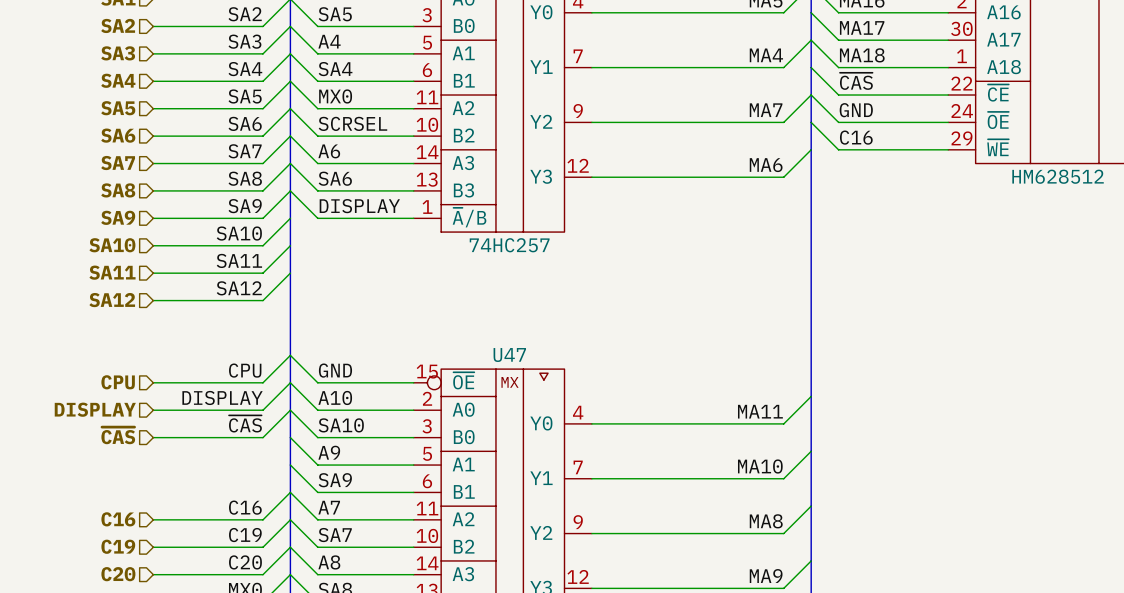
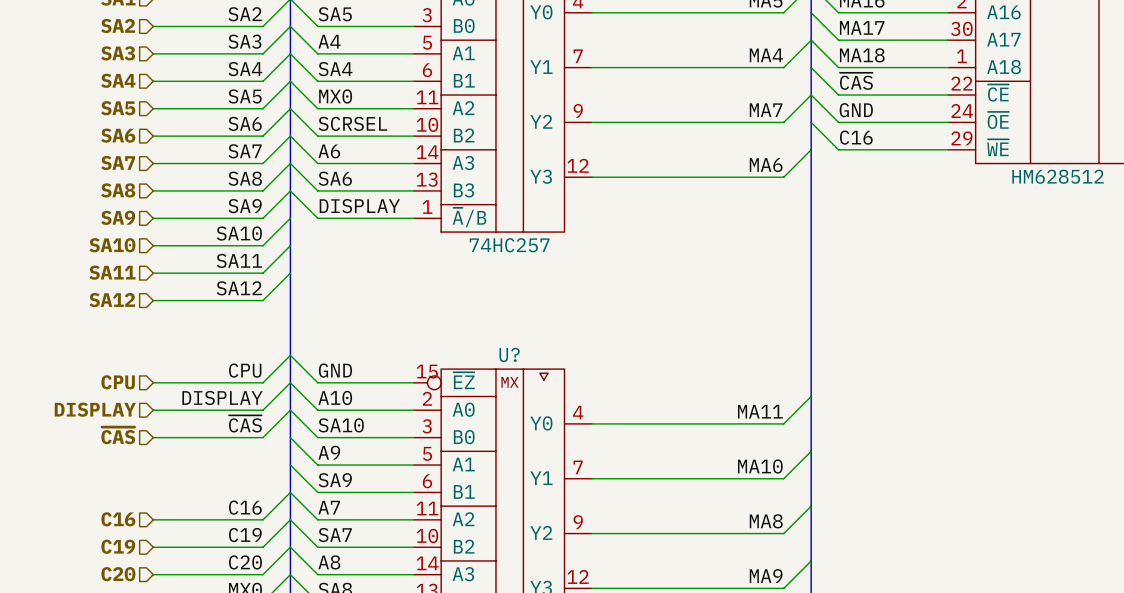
U47 name: U47 (509, 355) -> U? (509, 354)
U47 pin name: ~{OE} (463, 380) -> ~{EZ} (464, 380)

